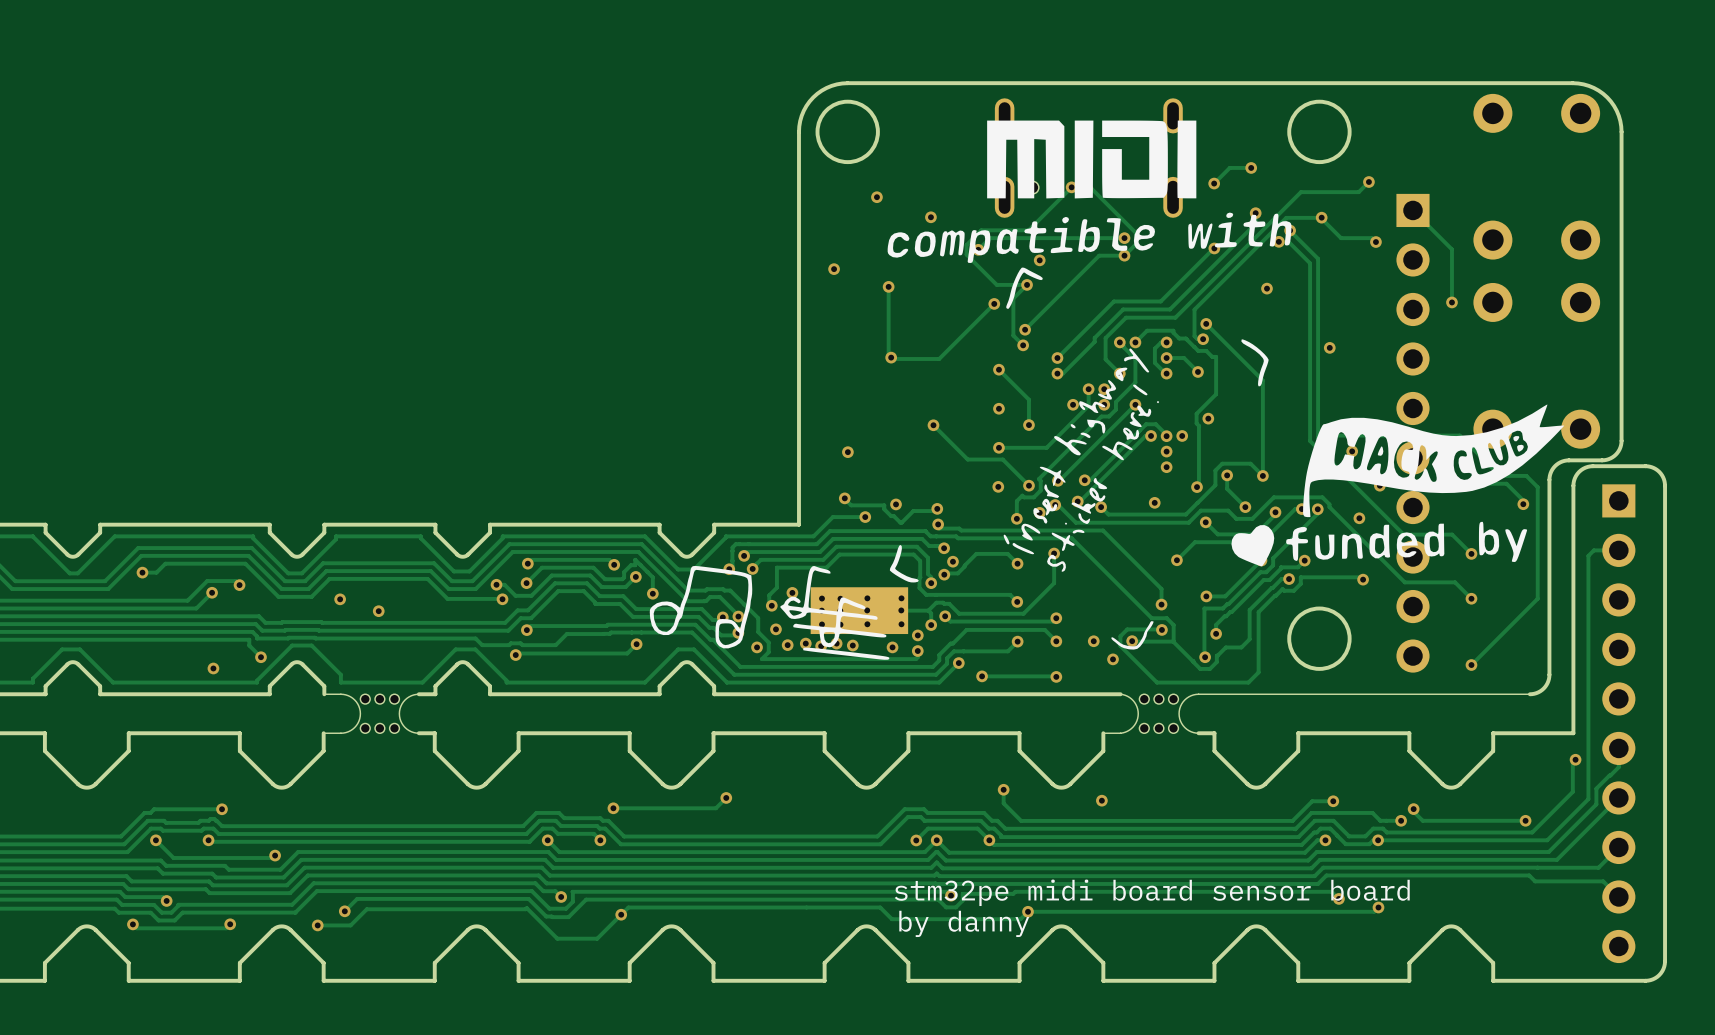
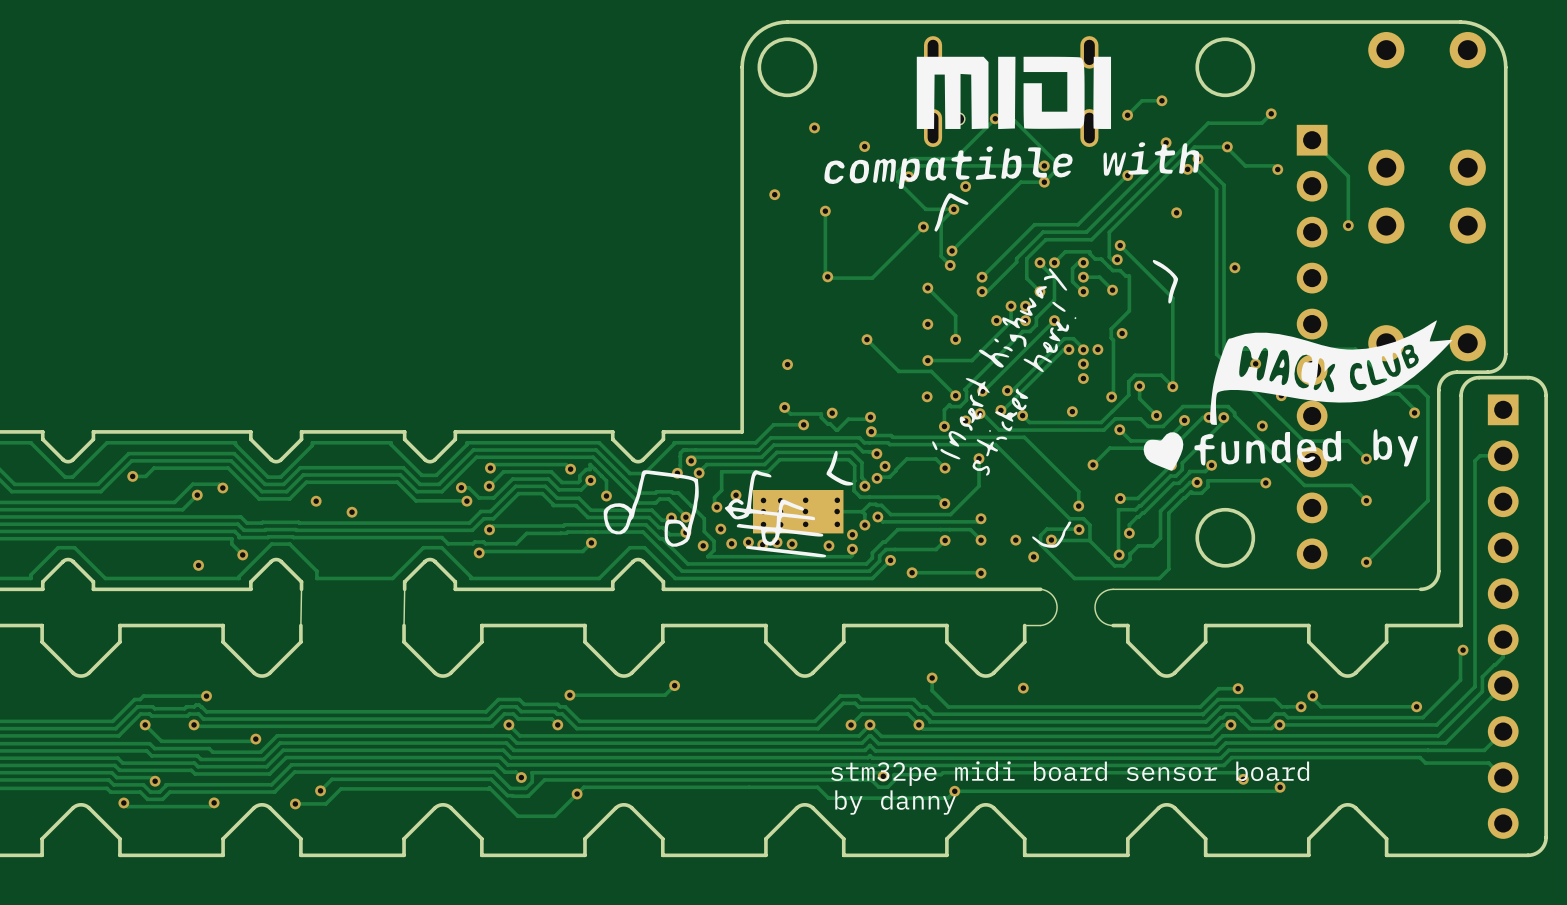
board edge: (324, 694) (343, 694) (350, 696) (357, 704) (360, 713) (357, 723) (350, 730) (343, 733) (323, 733) -> (301, 589) (300, 625)
board edge: (435, 694) (416, 694) (409, 696) (401, 704) (399, 713) (401, 723) (409, 730) (416, 733) (434, 733) -> (404, 589) (404, 625)
part: (379, 713) -> none
part: (1158, 713) -> none

